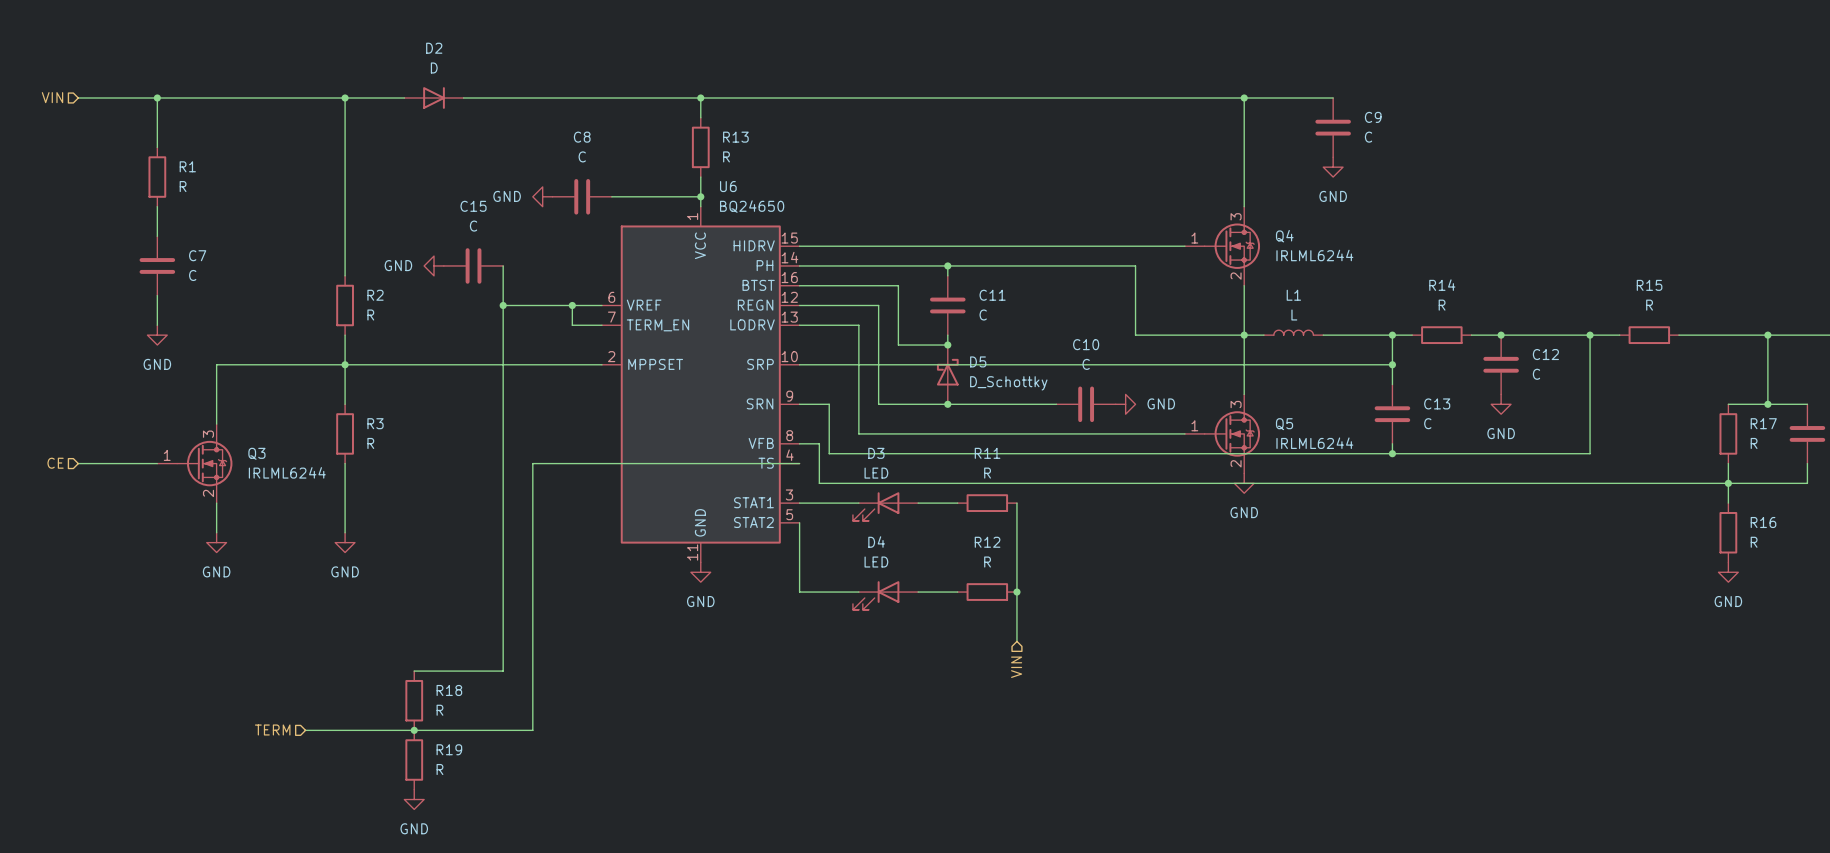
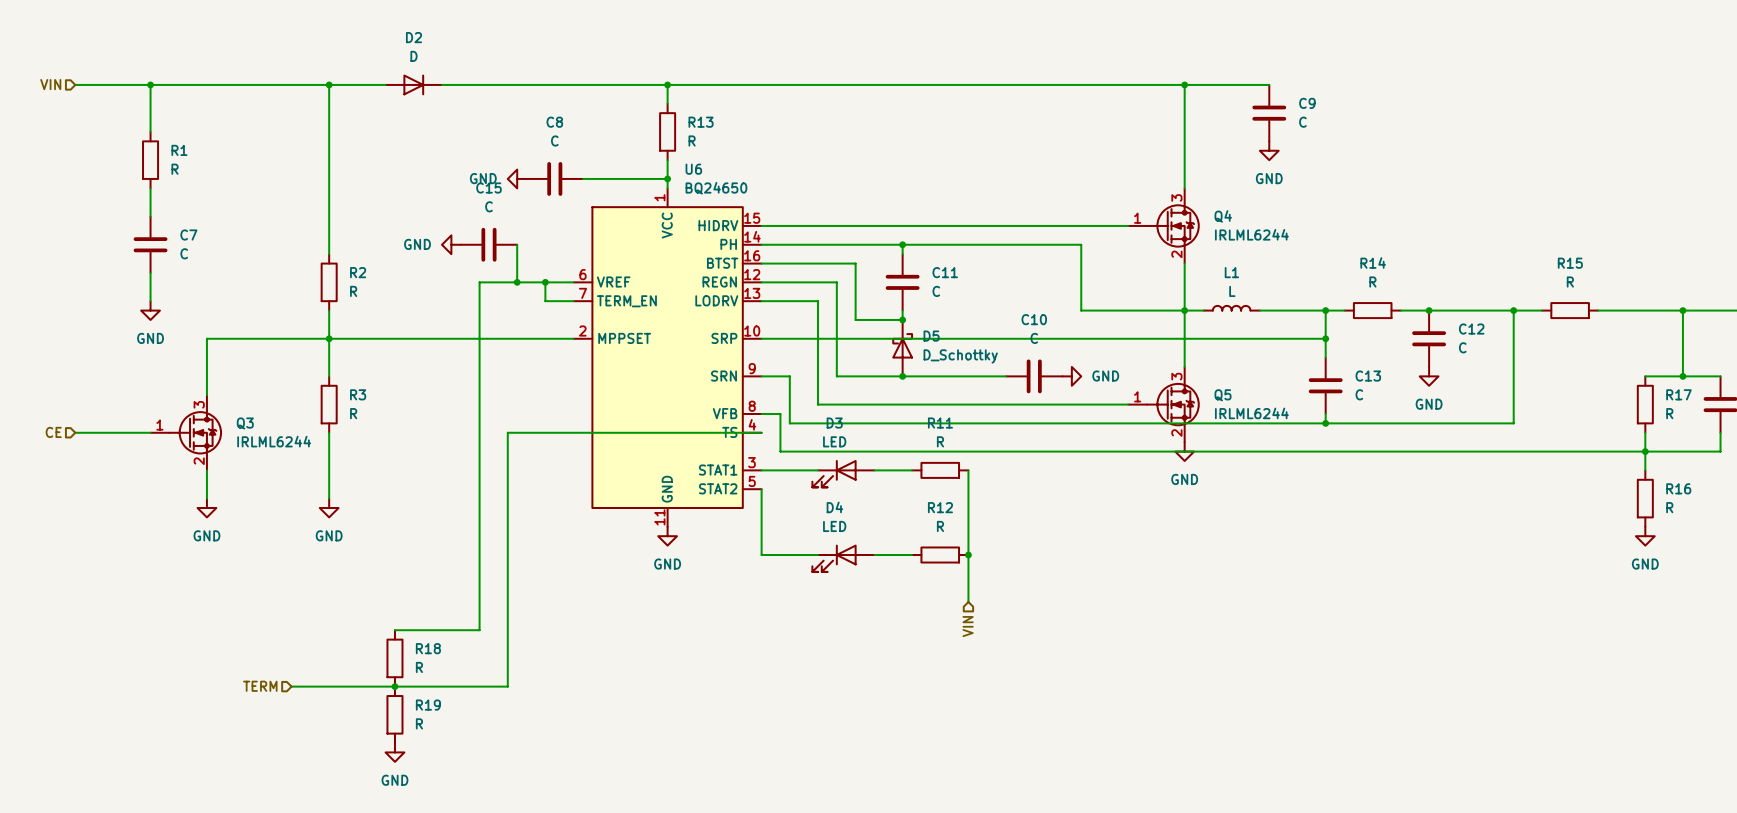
power symbol position: GND (434, 265) -> GND (451, 244)
C15 position: (473, 265) -> (488, 244)
wire: (503, 265) (503, 305) -> (517, 244) (517, 282)
junction position: (503, 305) -> (517, 282)

